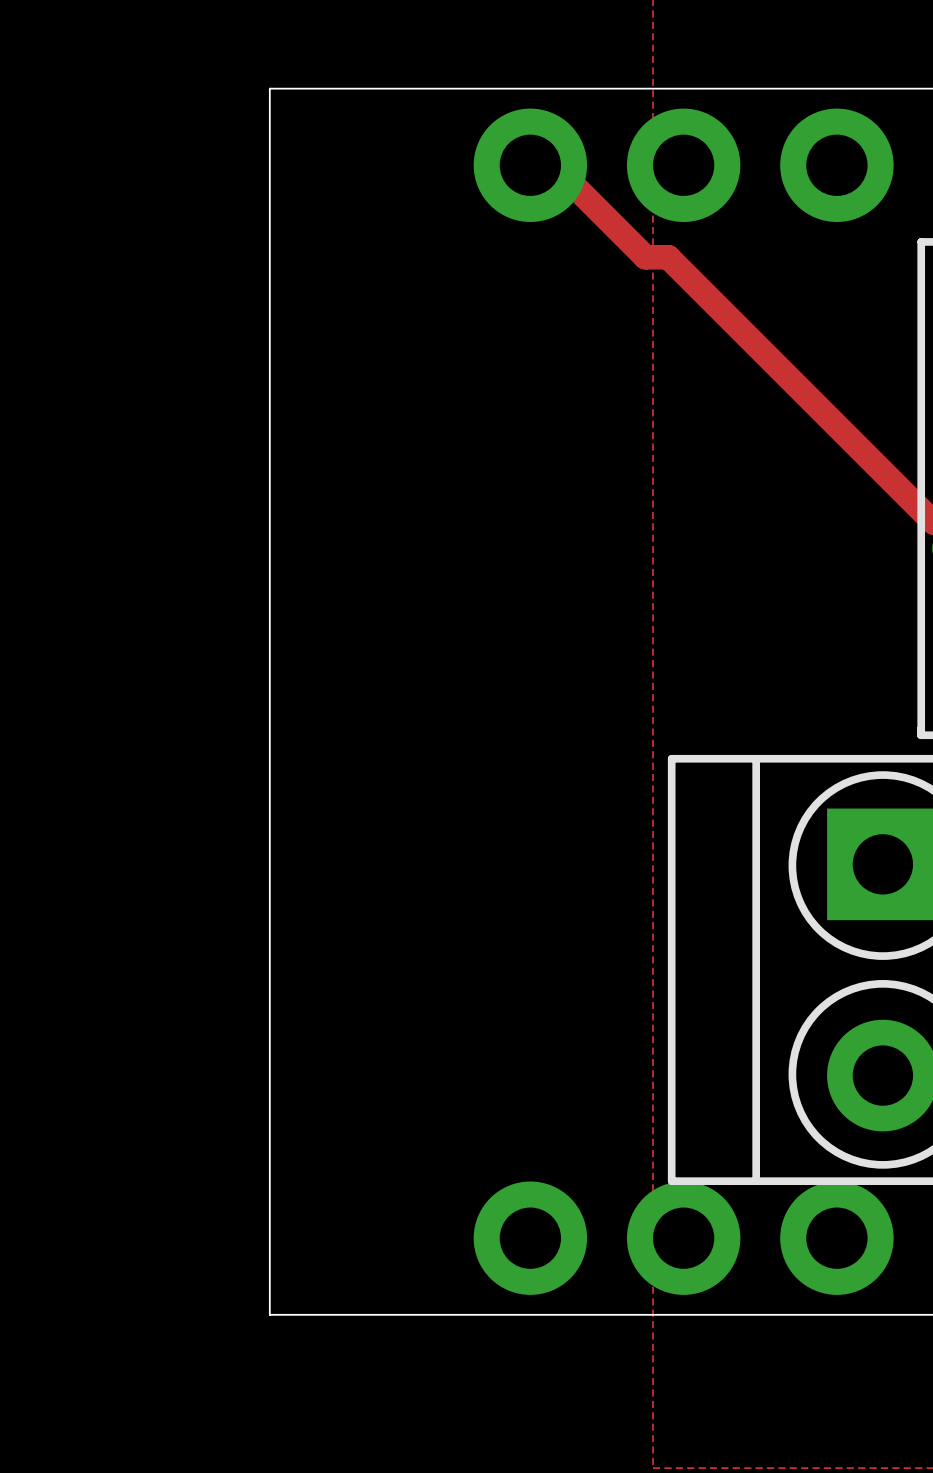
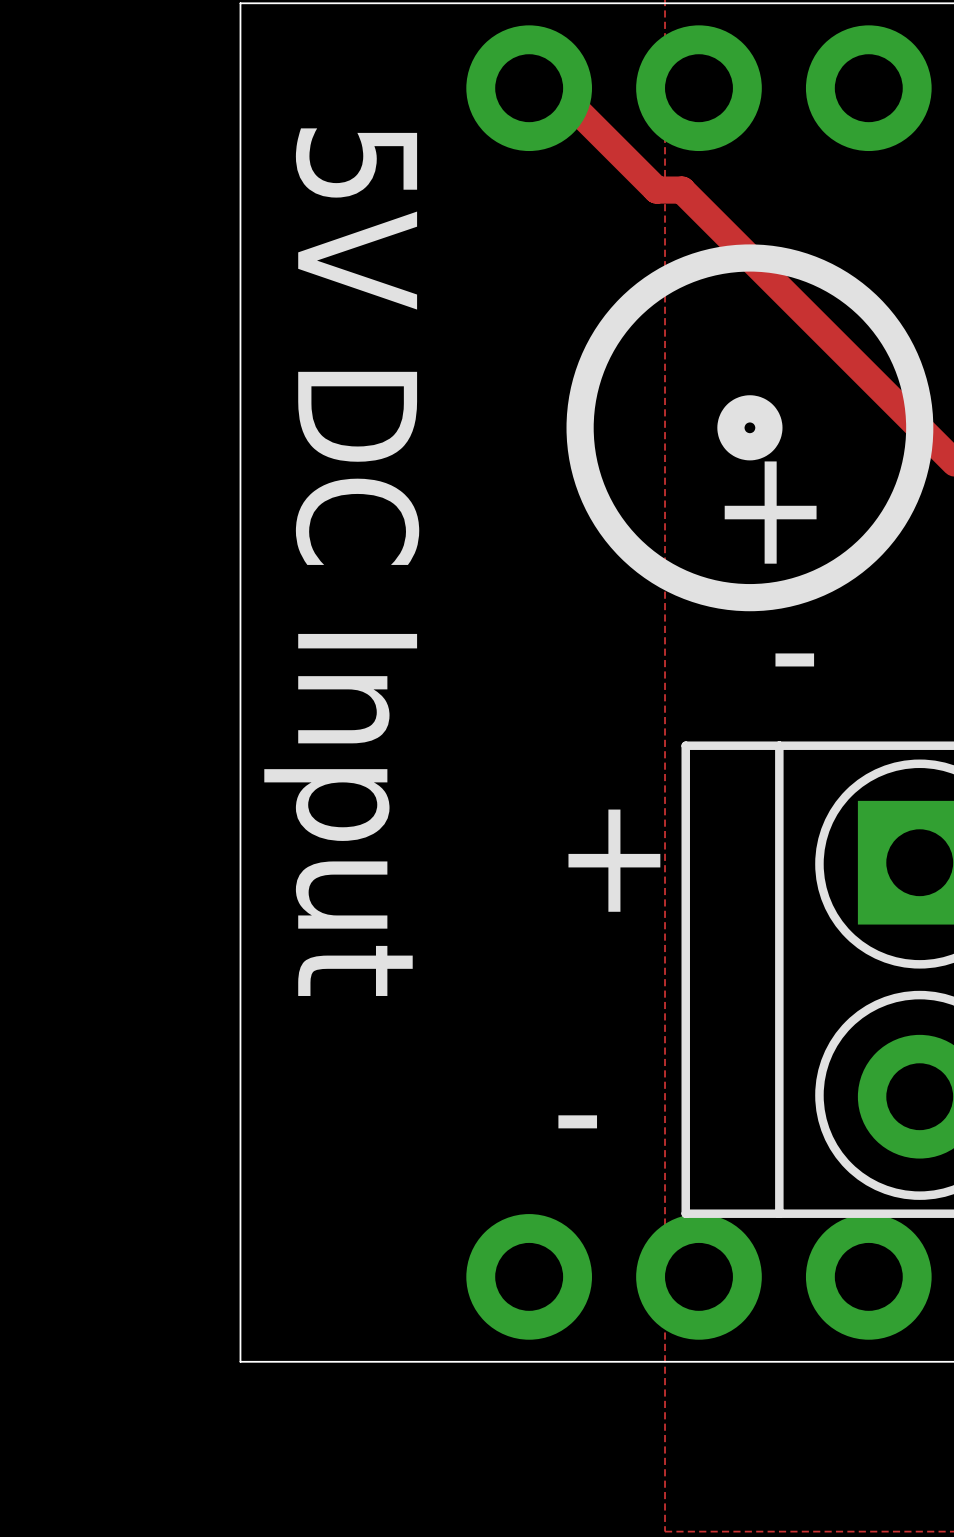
drawing: none -> [566, 244, 934, 612]
text: none -> + (770, 512)
text: none -> 5V DC Input (341, 562)
text: none -> - (794, 659)
text: none -> + (614, 860)
text: none -> - (577, 1121)

